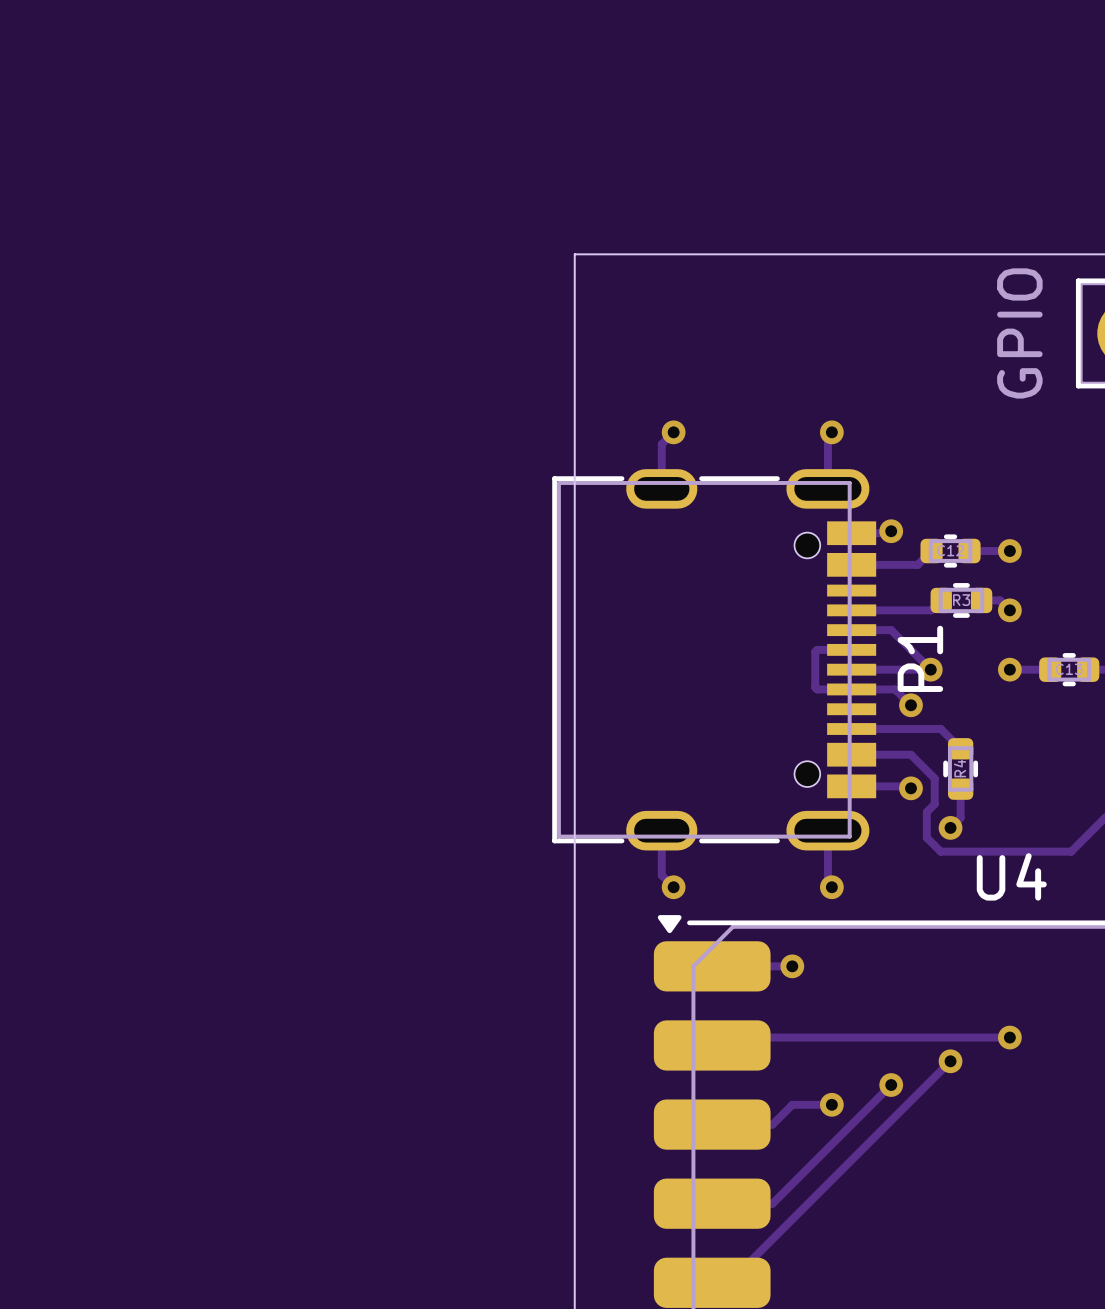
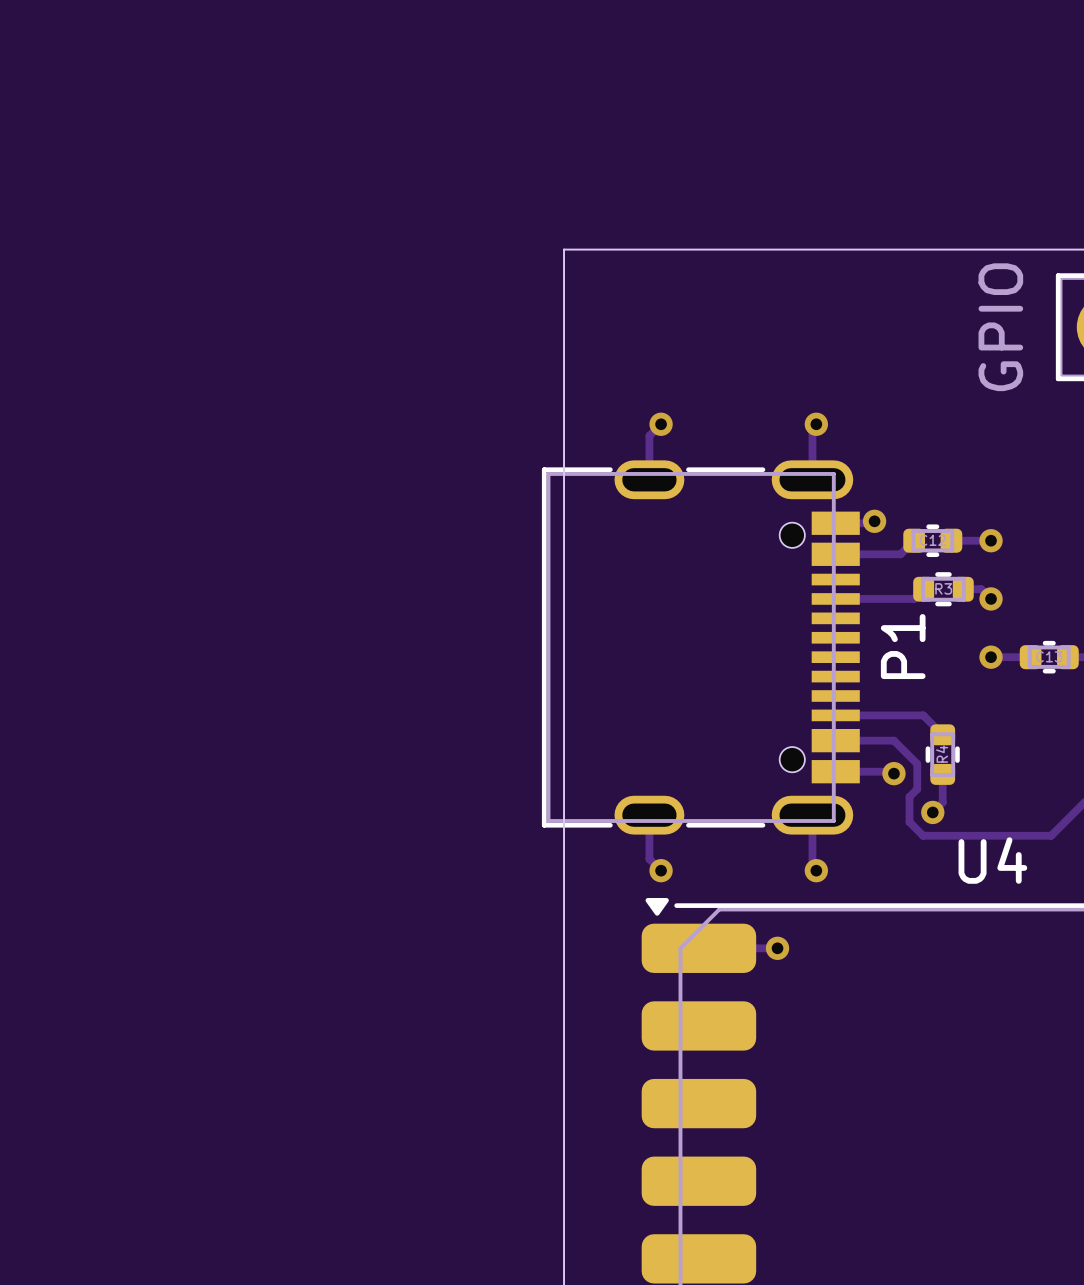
track: (851, 630) (891, 630) (930, 669) (851, 669) -> none
track: (851, 649) (817, 649) (815, 651) (815, 687) (817, 689) (895, 689) (910, 705) -> none
via: (930, 669) -> none
via: (910, 705) -> none
track: (1009, 1037) (720, 1037) (712, 1045) -> none
via: (1009, 1037) -> none
track: (950, 1061) (729, 1282) (712, 1282) -> none
via: (950, 1061) -> none
track: (891, 1085) (772, 1203) (712, 1203) -> none
via: (891, 1085) -> none
track: (831, 1104) (792, 1104) (772, 1124) (712, 1124) -> none
via: (831, 1104) -> none

